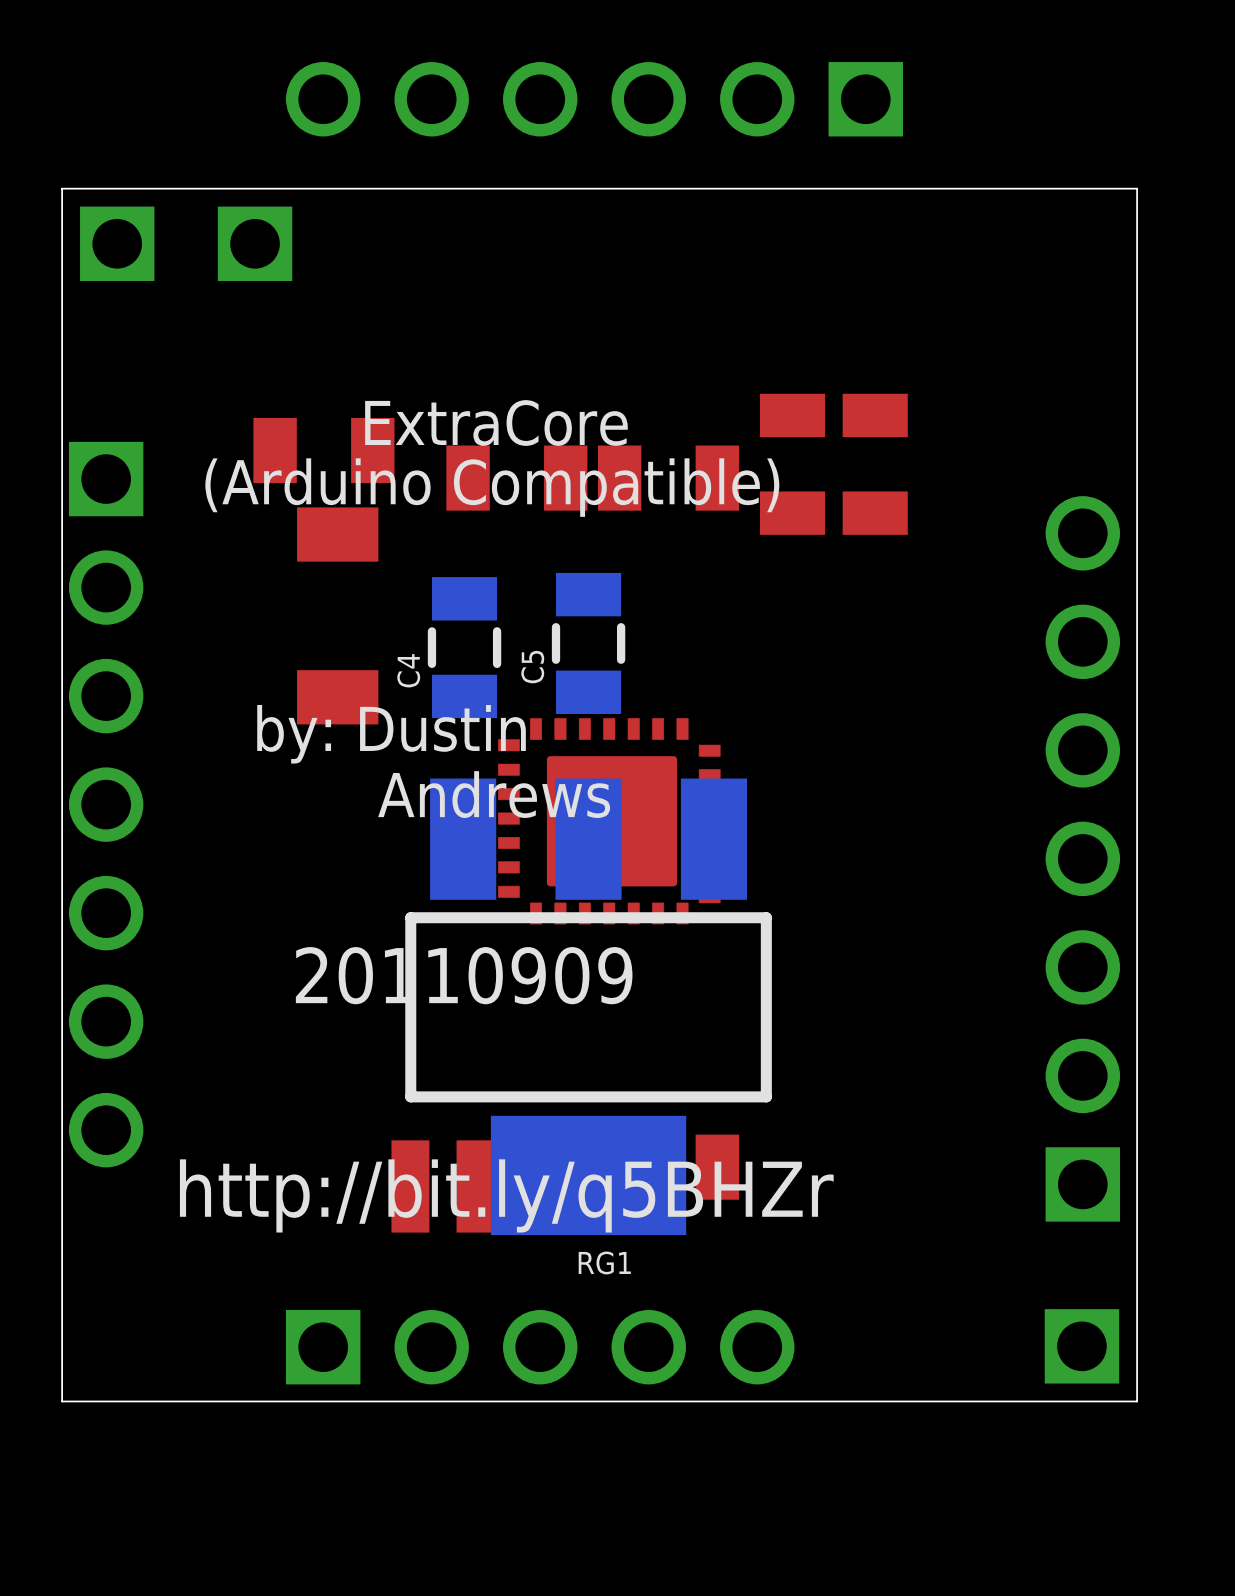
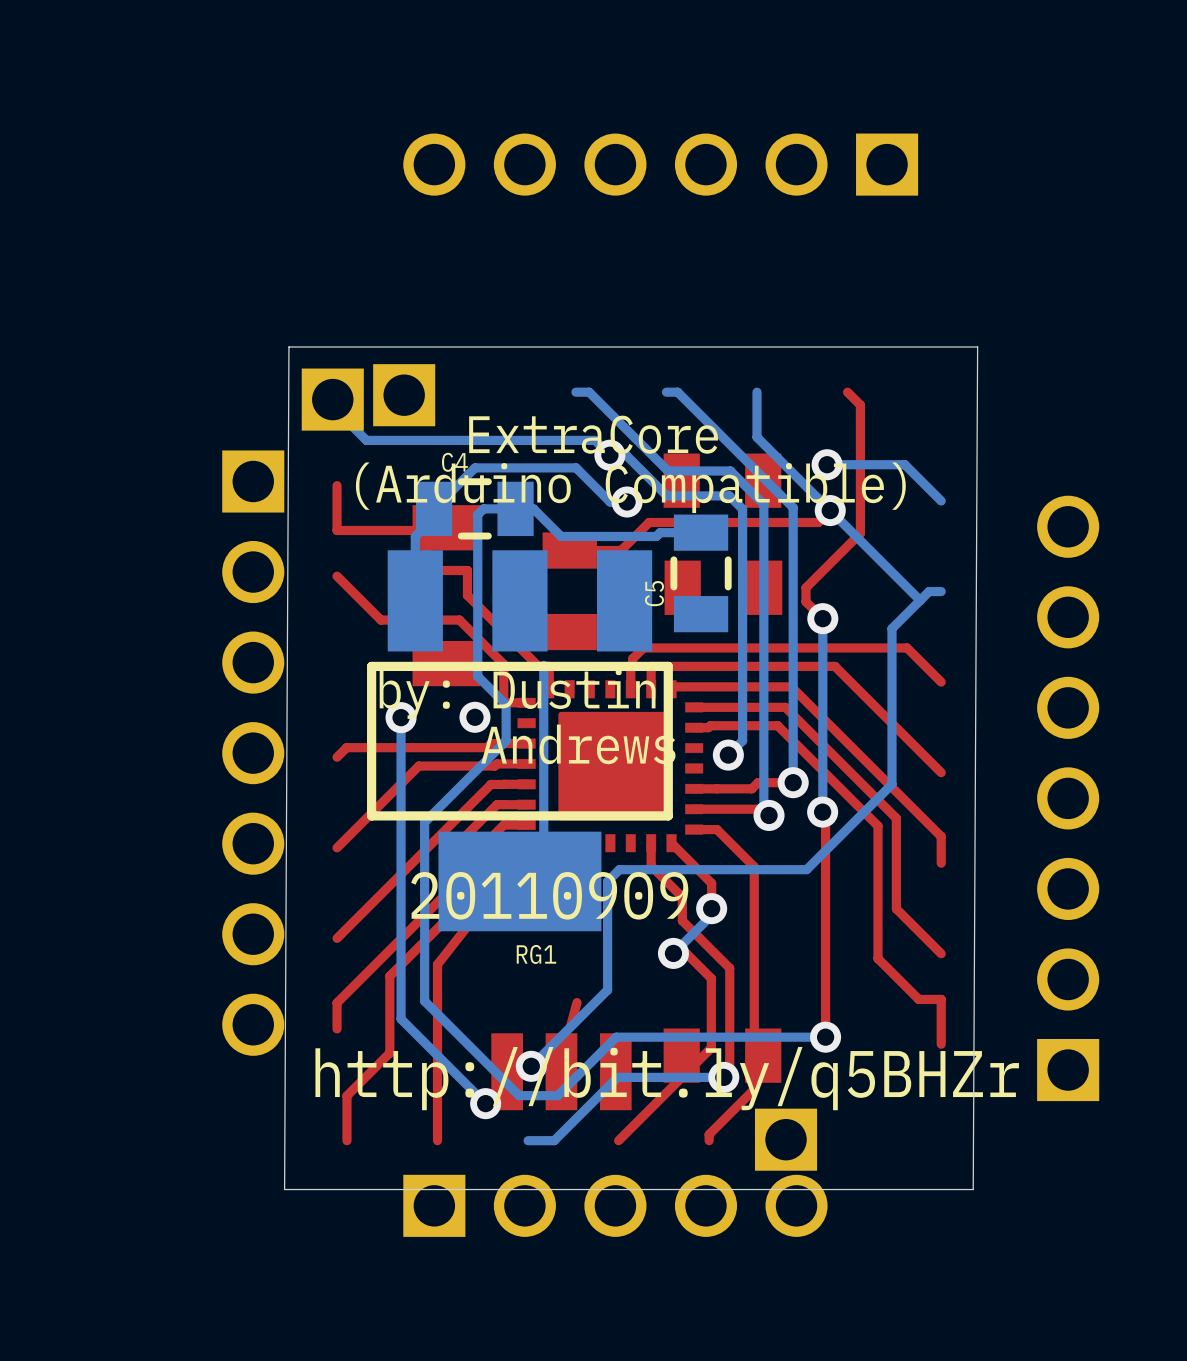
board edge: (1137, 188) (1137, 1401) (62, 1401) (62, 188) (1137, 188) -> (977, 346) (973, 1189) (284, 1189) (288, 346) (977, 346)
part: (117, 243) -> none
part: (255, 243) -> none
bottom track: none -> (575, 392) (589, 392) (668, 471) (730, 471) (763, 504) (763, 810) (769, 815)
bottom track: none -> (666, 392) (677, 392) (793, 507) (793, 782)
bottom track: none -> (757, 392) (757, 437) (920, 600)
top track: none -> (847, 392) (860, 405) (860, 533) (806, 587) (806, 601) (822, 618)
part: none -> (404, 395)
bottom track: none -> (332, 399) (332, 406) (366, 440) (595, 440) (609, 455) (626, 455) (666, 495) (729, 495) (742, 509) (742, 740) (728, 755)
part: none -> (332, 399)
via: none -> (609, 455)
part: (323, 450) -> none
bottom track: none -> (827, 464) (904, 464) (941, 501)
via: none -> (827, 464)
part: (792, 464) -> none
part: (875, 464) -> none
part: (516, 478) -> none
top track: none -> (337, 485) (337, 530) (418, 530) (426, 538) (426, 570) (467, 570) (467, 595) (538, 666) (549, 666) (549, 689)
bottom track: none -> (627, 502) (610, 502) (576, 467) (475, 467) (434, 508) (434, 517) (415, 536) (415, 600)
via: none -> (627, 502)
top track: none -> (830, 510) (818, 522) (649, 522) (621, 550) (569, 550)
via: none -> (830, 510)
bottom track: none -> (701, 532) (660, 532) (656, 536) (561, 536) (533, 508) (483, 508) (477, 514) (477, 676) (506, 704) (506, 740) (424, 822) (424, 1001) (519, 1095) (557, 1095) (616, 1037) (825, 1037)
top track: none -> (337, 576) (380, 620) (459, 620) (503, 664) (503, 702) (526, 702)
part: none -> (723, 587)
part: none -> (569, 591)
bottom track: none -> (941, 591) (929, 591) (891, 628) (891, 784) (806, 869) (619, 869) (607, 881) (607, 990) (531, 1066)
C5 position: (588, 643) -> (701, 573)
bottom track: none -> (822, 618) (822, 811)
via: none -> (822, 618)
C4 rotation: 0° (464, 647) -> 90° clockwise (474, 508)
C4 position: (464, 647) -> (474, 508)
bottom track: none -> (543, 665) (543, 881)
top track: none -> (941, 682) (907, 647) (643, 647) (632, 658) (630, 689)
top track: none -> (651, 689) (651, 666) (834, 666) (941, 772)
top track: none -> (671, 689) (673, 686) (791, 686) (941, 836) (941, 863)
top track: none -> (694, 707) (785, 707) (896, 818) (896, 908) (941, 953)
via: none -> (474, 717)
bottom track: none -> (401, 717) (401, 1019) (485, 1103)
via: none -> (401, 717)
top track: none -> (694, 727) (708, 727) (710, 725) (777, 725) (877, 825) (877, 958) (918, 999) (941, 999) (941, 1044)
top track: none -> (526, 743) (491, 743) (487, 747) (346, 747) (337, 757)
via: none -> (728, 755)
top track: none -> (526, 763) (418, 766) (337, 847)
part position: (609, 821) -> (610, 766)
top track: none -> (793, 782) (757, 782) (751, 788) (694, 788)
via: none -> (793, 782)
top track: none -> (526, 784) (490, 784) (337, 938)
top track: none -> (526, 804) (496, 804) (447, 853) (447, 892) (337, 1002) (337, 1028)
top track: none -> (694, 809) (762, 809) (769, 815)
top track: none -> (822, 812) (825, 815) (825, 1037)
via: none -> (822, 812)
via: none -> (769, 815)
top track: none -> (526, 825) (503, 825) (466, 862) (466, 899) (389, 976) (389, 1052) (346, 1095) (346, 1140)
top track: none -> (694, 829) (717, 829) (754, 866) (754, 1089) (709, 1134) (709, 1140)
top track: none -> (549, 843) (542, 849) (525, 849) (479, 883) (479, 910) (437, 964) (437, 1140)
top track: none -> (651, 843) (651, 866) (682, 897) (682, 920) (729, 968) (729, 1071) (723, 1077)
top track: none -> (671, 843) (711, 883) (711, 908)
bottom track: none -> (711, 908) (711, 915) (673, 953)
via: none -> (711, 908)
RG1 position: (588, 1006) -> (519, 740)
top track: none -> (673, 953) (686, 953) (711, 978) (711, 1047) (618, 1140)
via: none -> (673, 953)
top track: none -> (577, 1002) (570, 1025)
via: none -> (825, 1037)
via: none -> (531, 1066)
bottom track: none -> (723, 1077) (617, 1077) (554, 1140) (528, 1140)
via: none -> (723, 1077)
via: none -> (485, 1103)
part position: (1081, 1346) -> (786, 1139)

